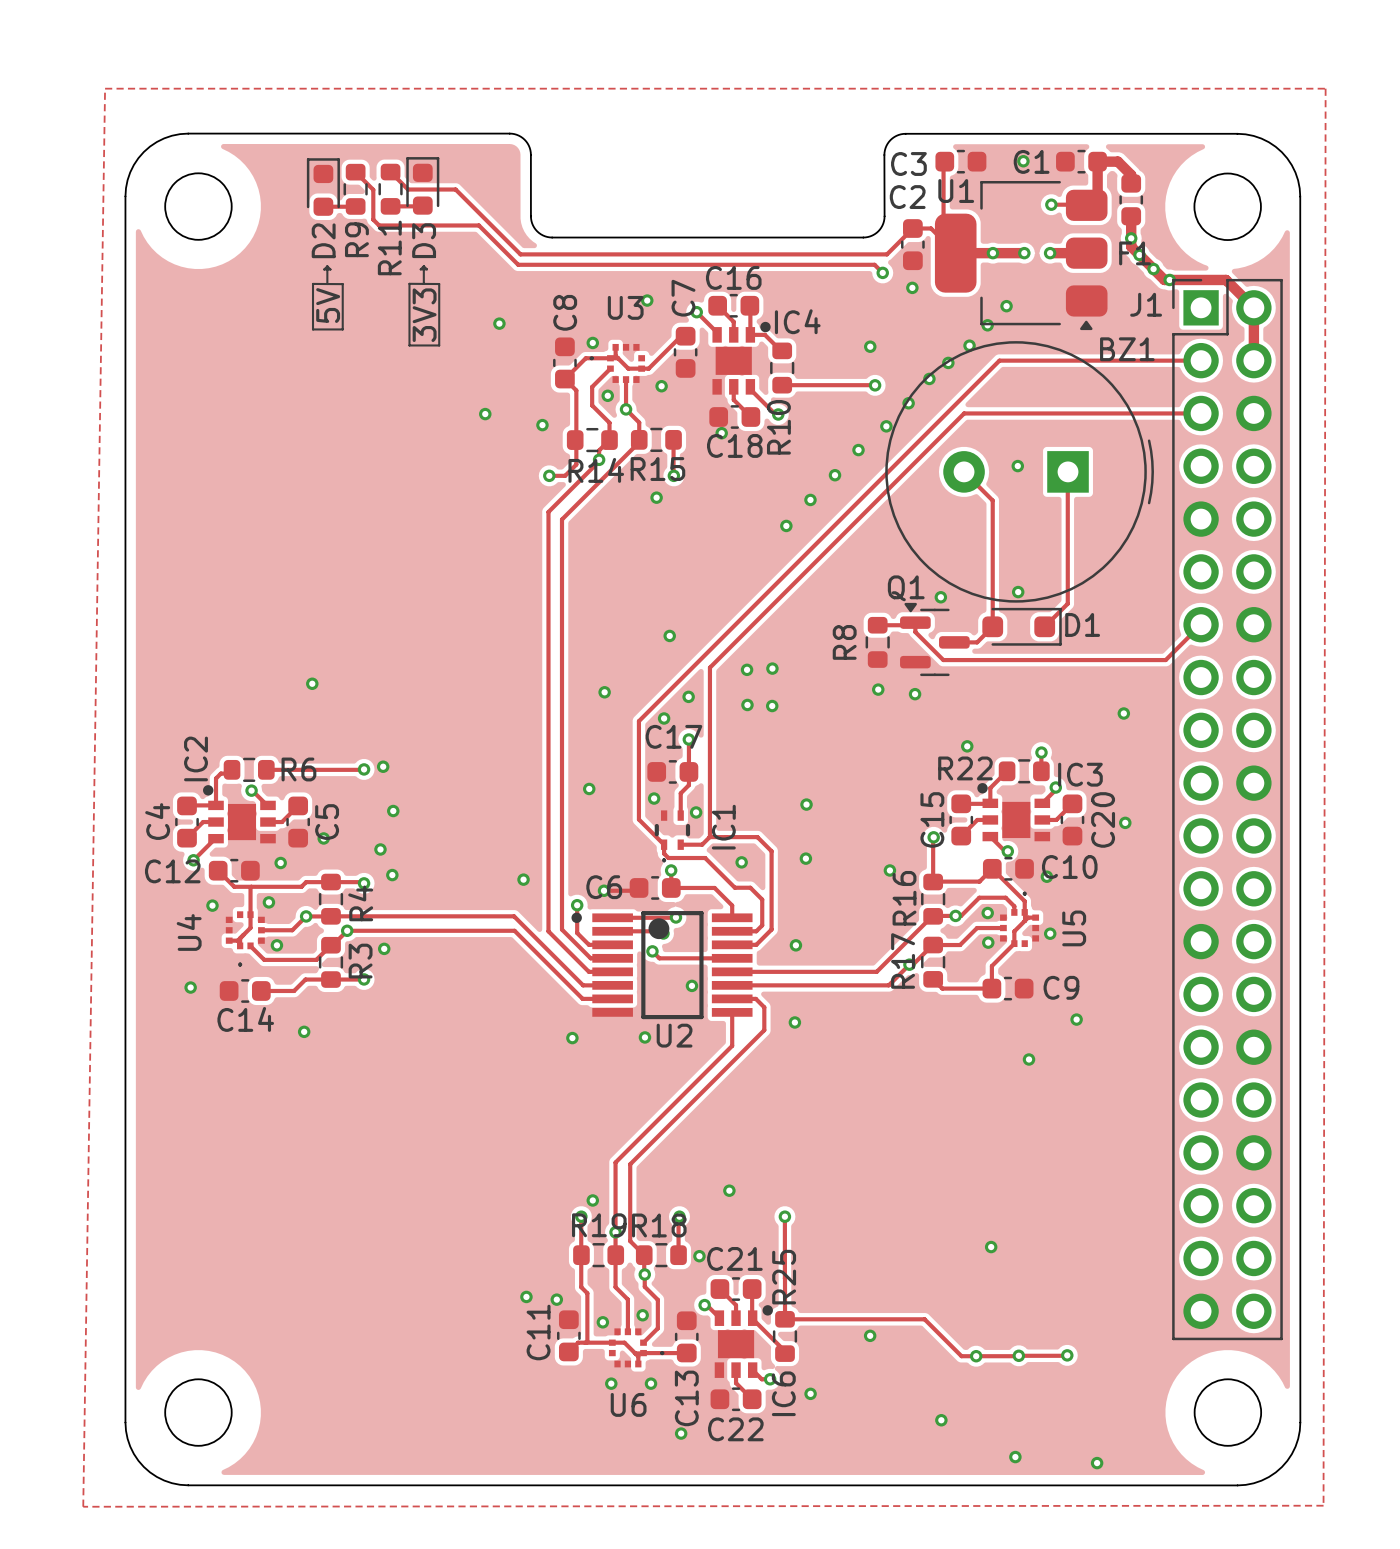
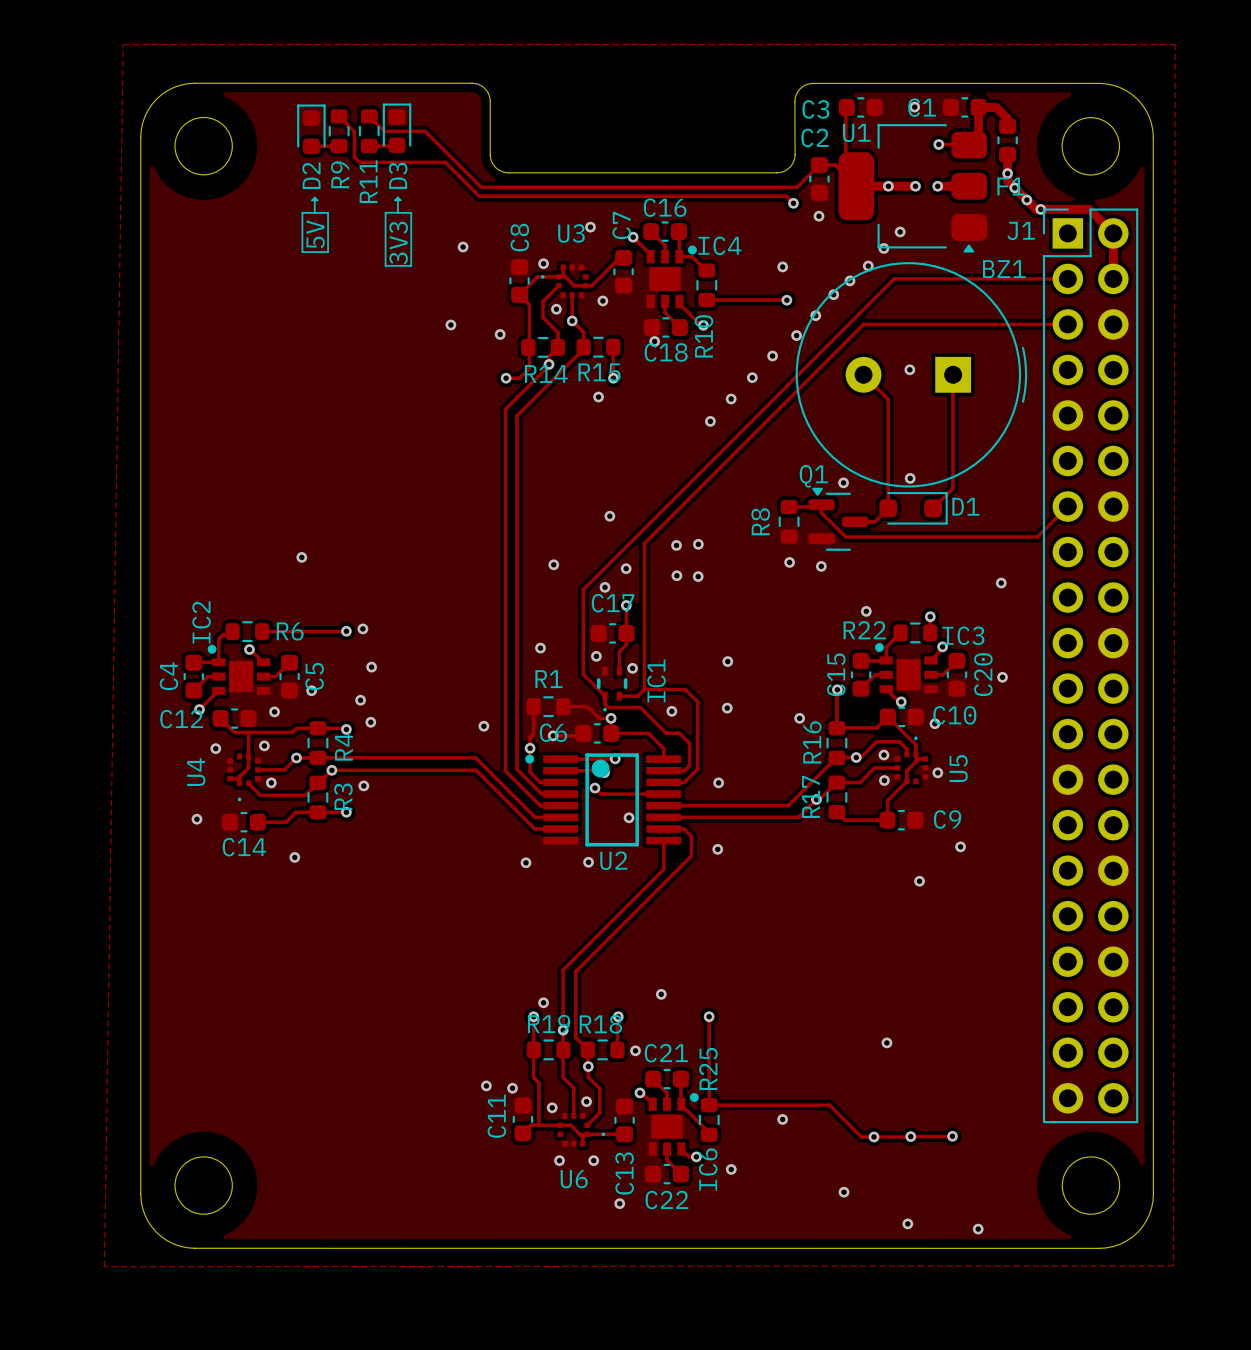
track: none -> (533, 706) (533, 733) (530, 737) (530, 748)
R1: none -> (548, 706)
track: none -> (563, 706) (587, 706) (599, 718) (611, 718)

